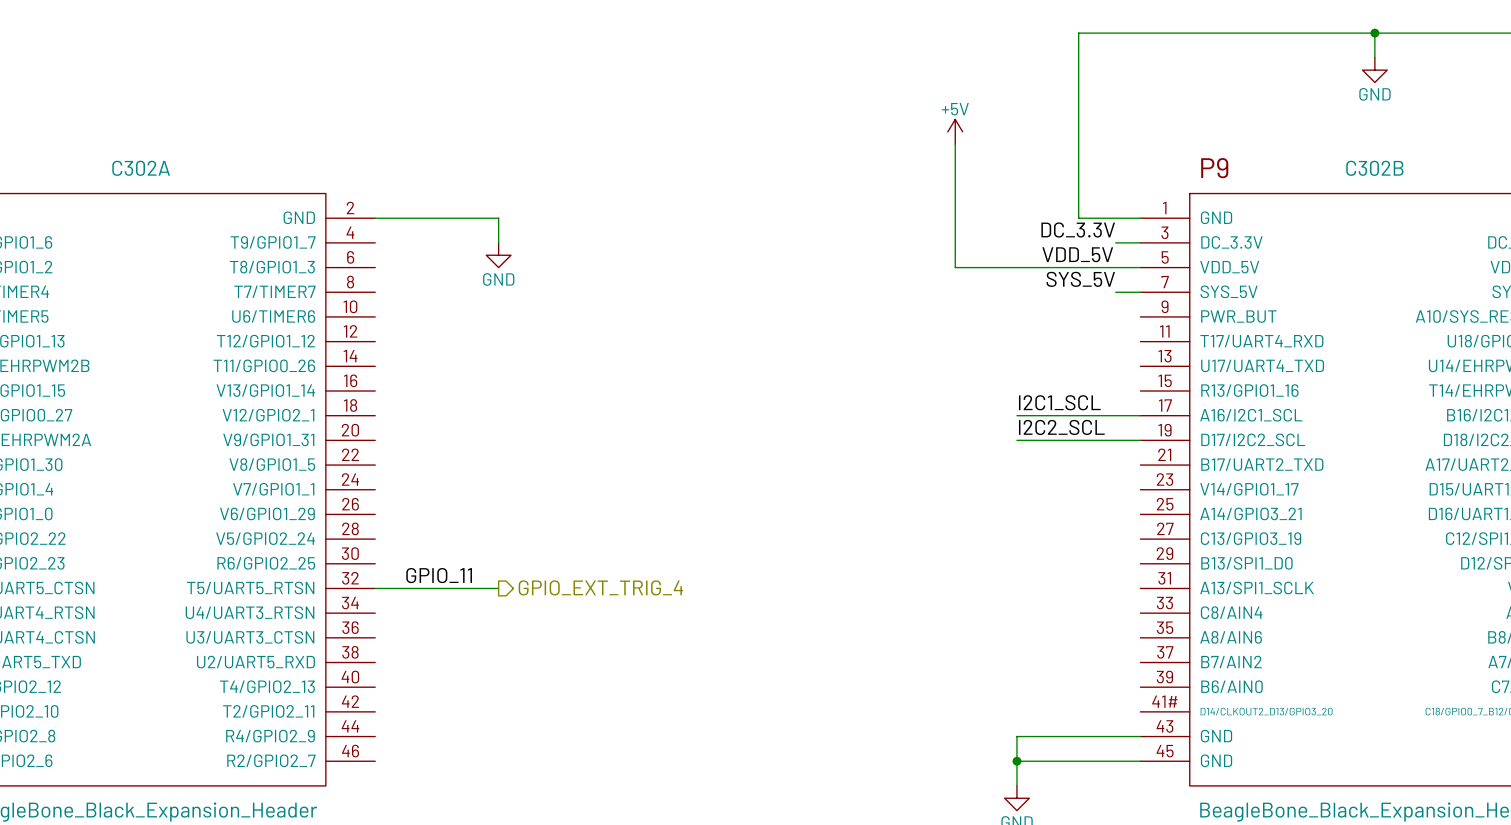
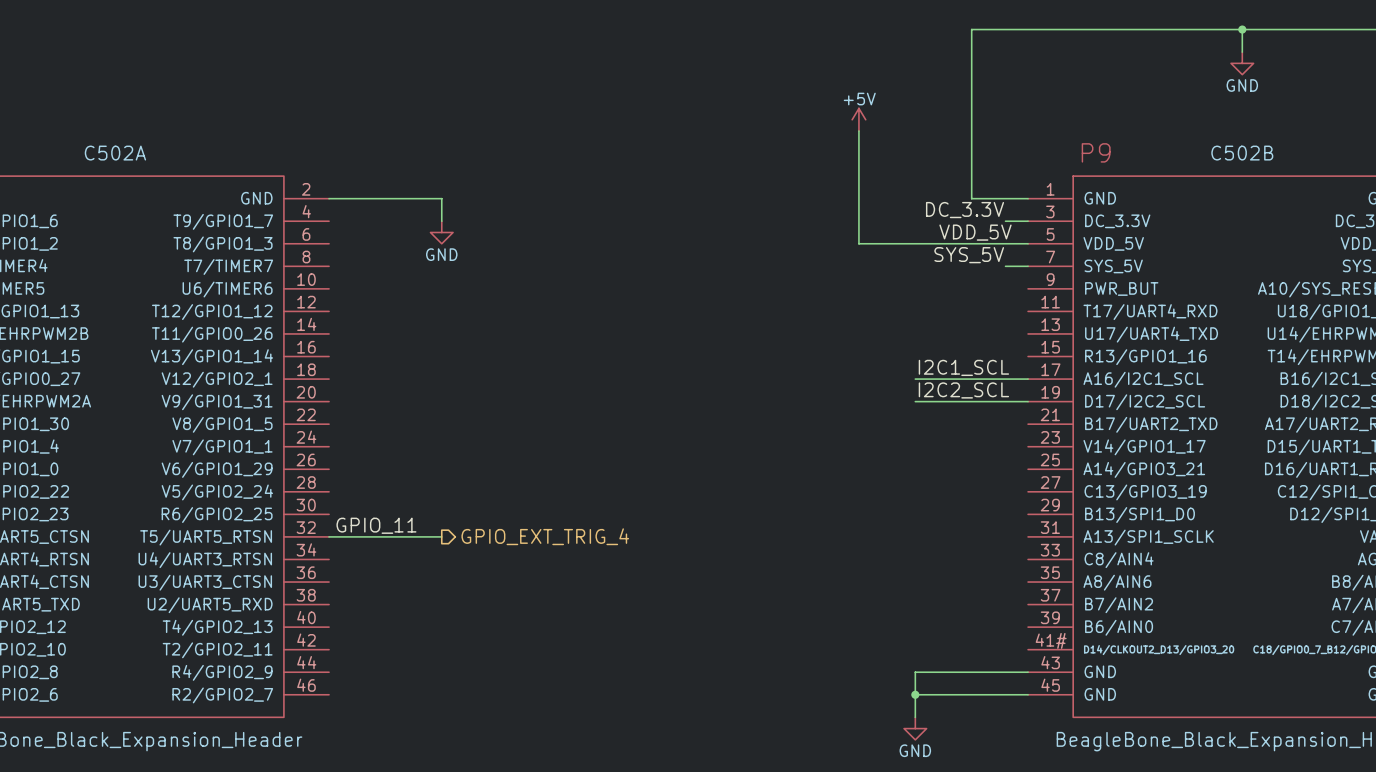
C302A name: C302A (141, 168) -> C502A (115, 153)
C302B name: C302B (1374, 168) -> C502B (1242, 153)

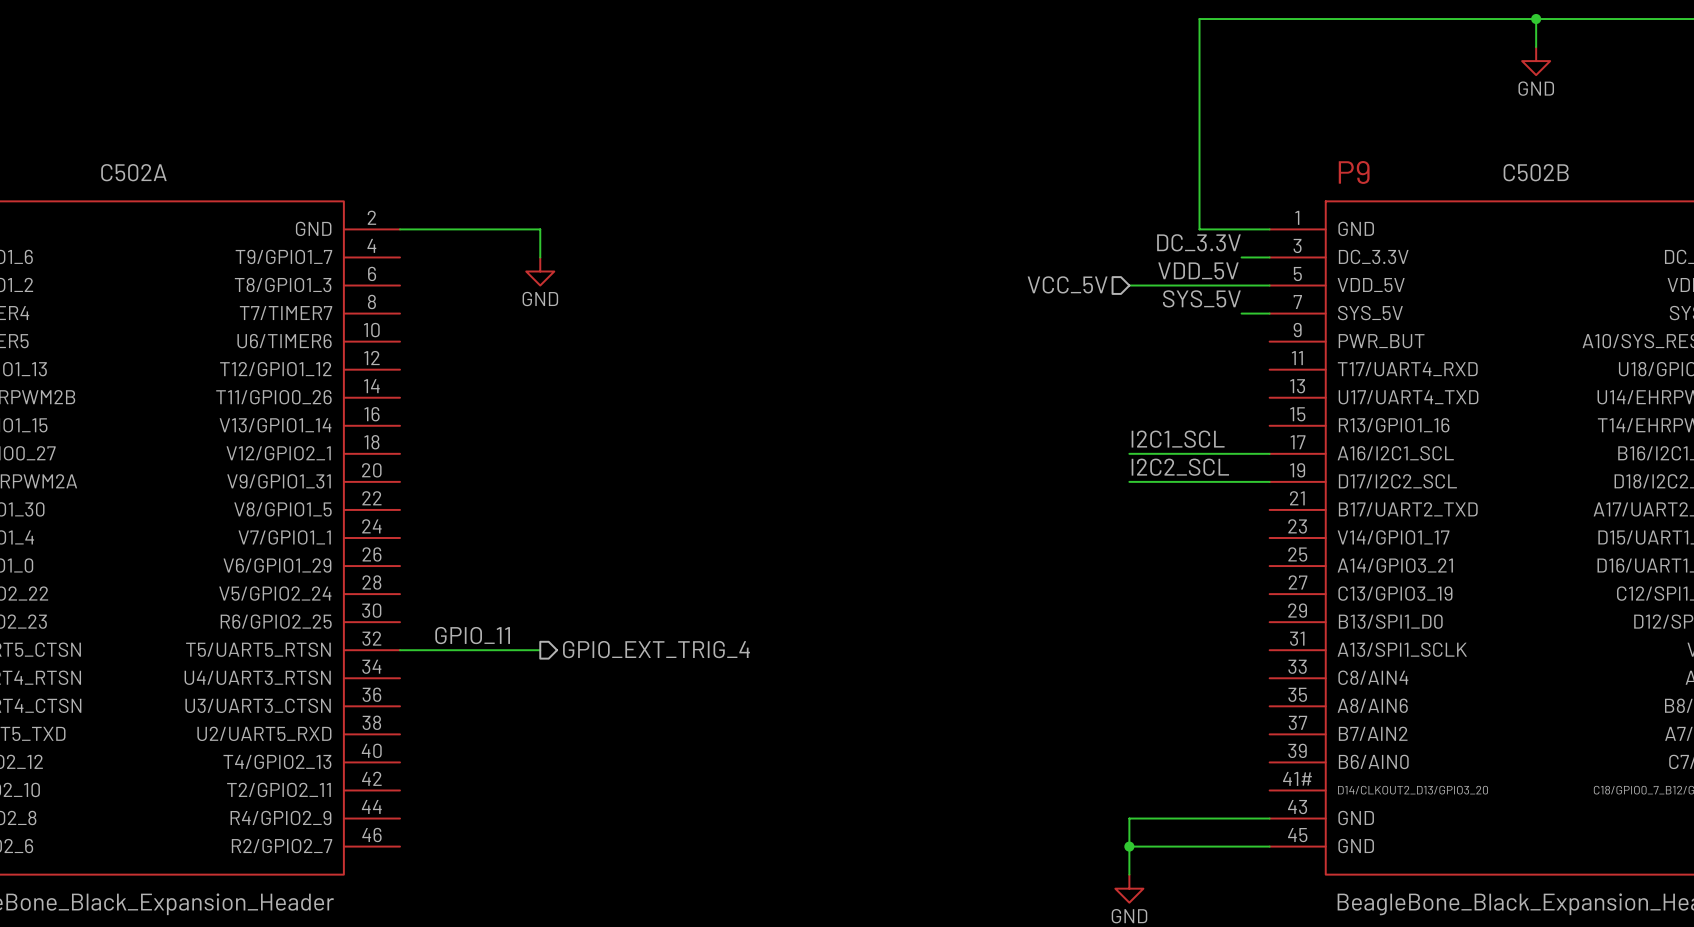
power symbol: +5V (858, 119) -> none
wire: (858, 131) (858, 243) (915, 243) -> none
hierarchical label: none -> VCC_5V (1067, 284)

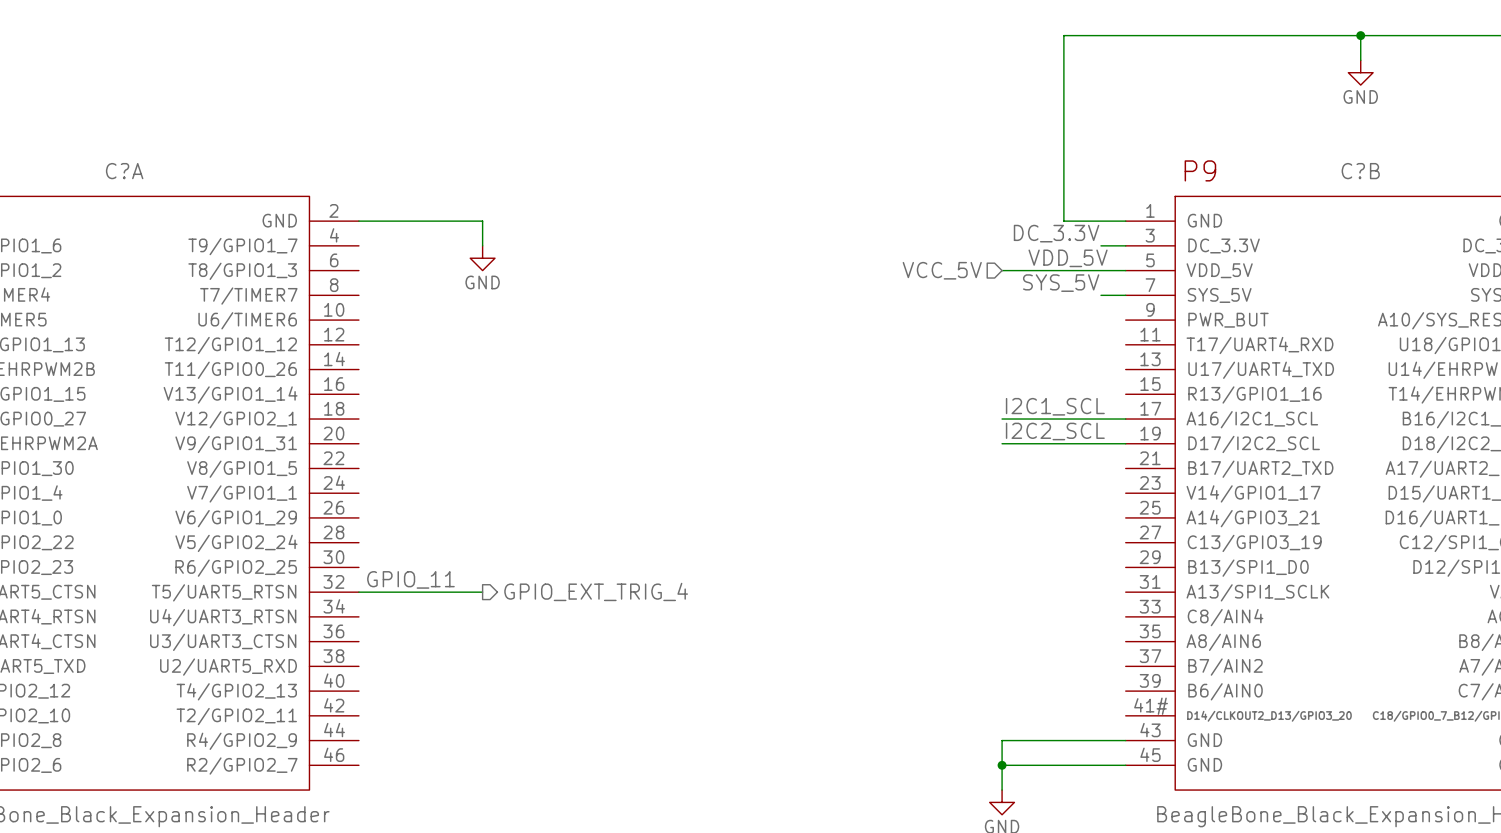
C502A name: C502A (133, 172) -> C?A (124, 171)
C502B name: C502B (1536, 172) -> C?B (1360, 171)

